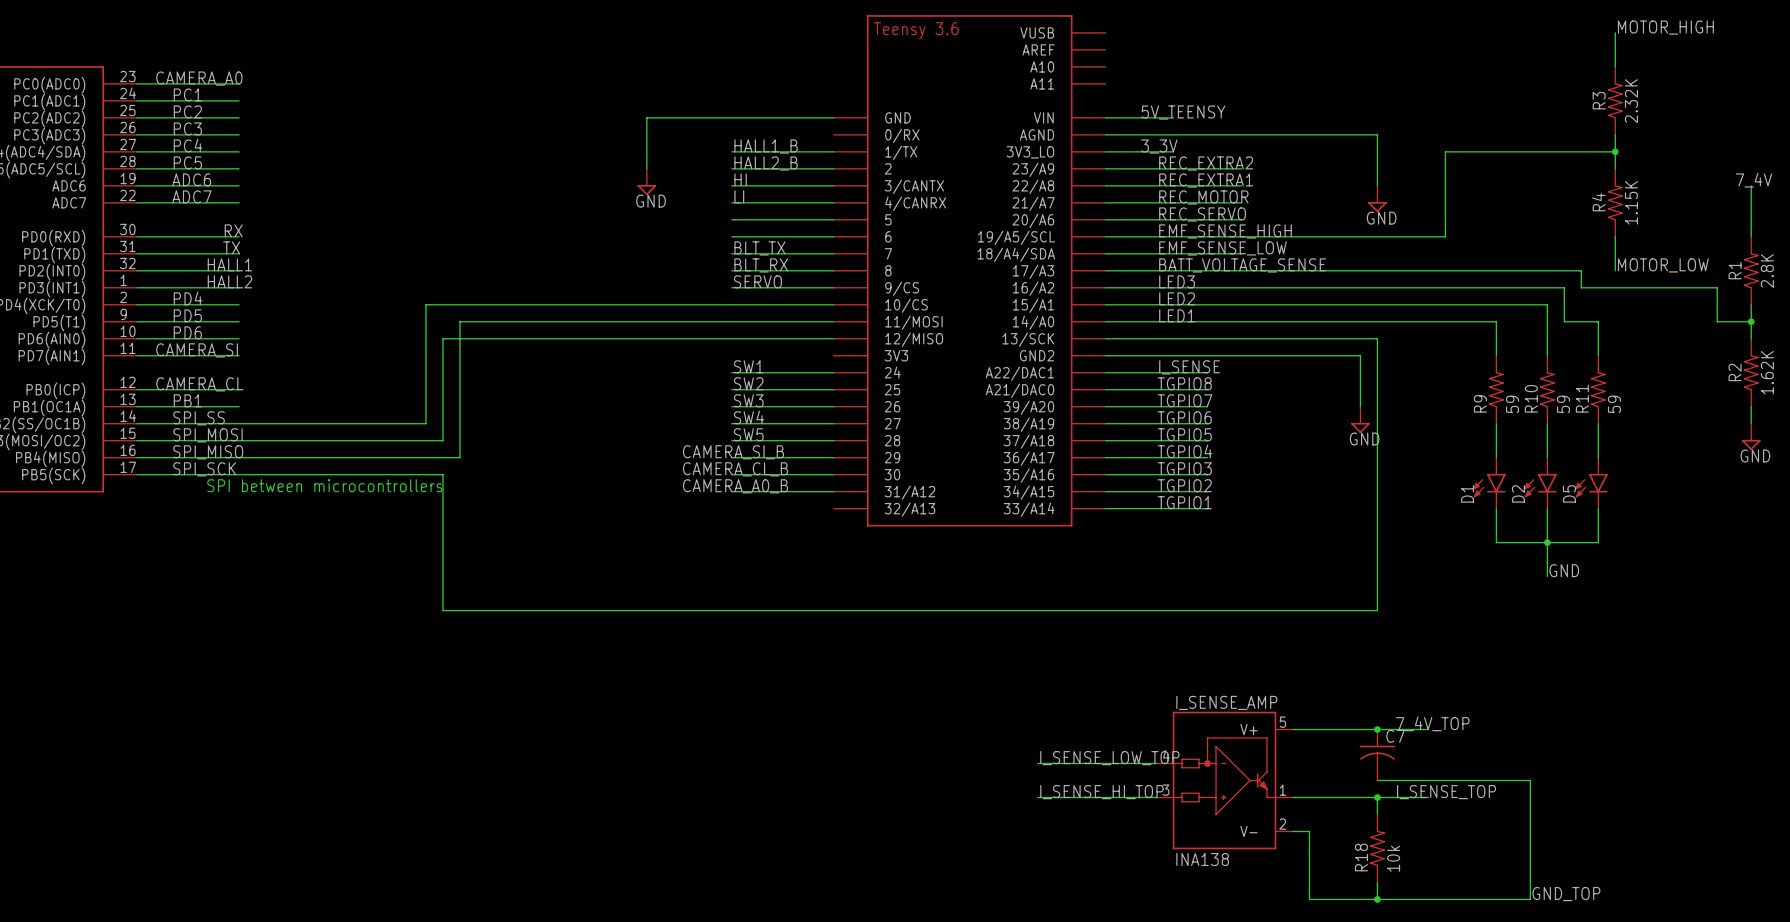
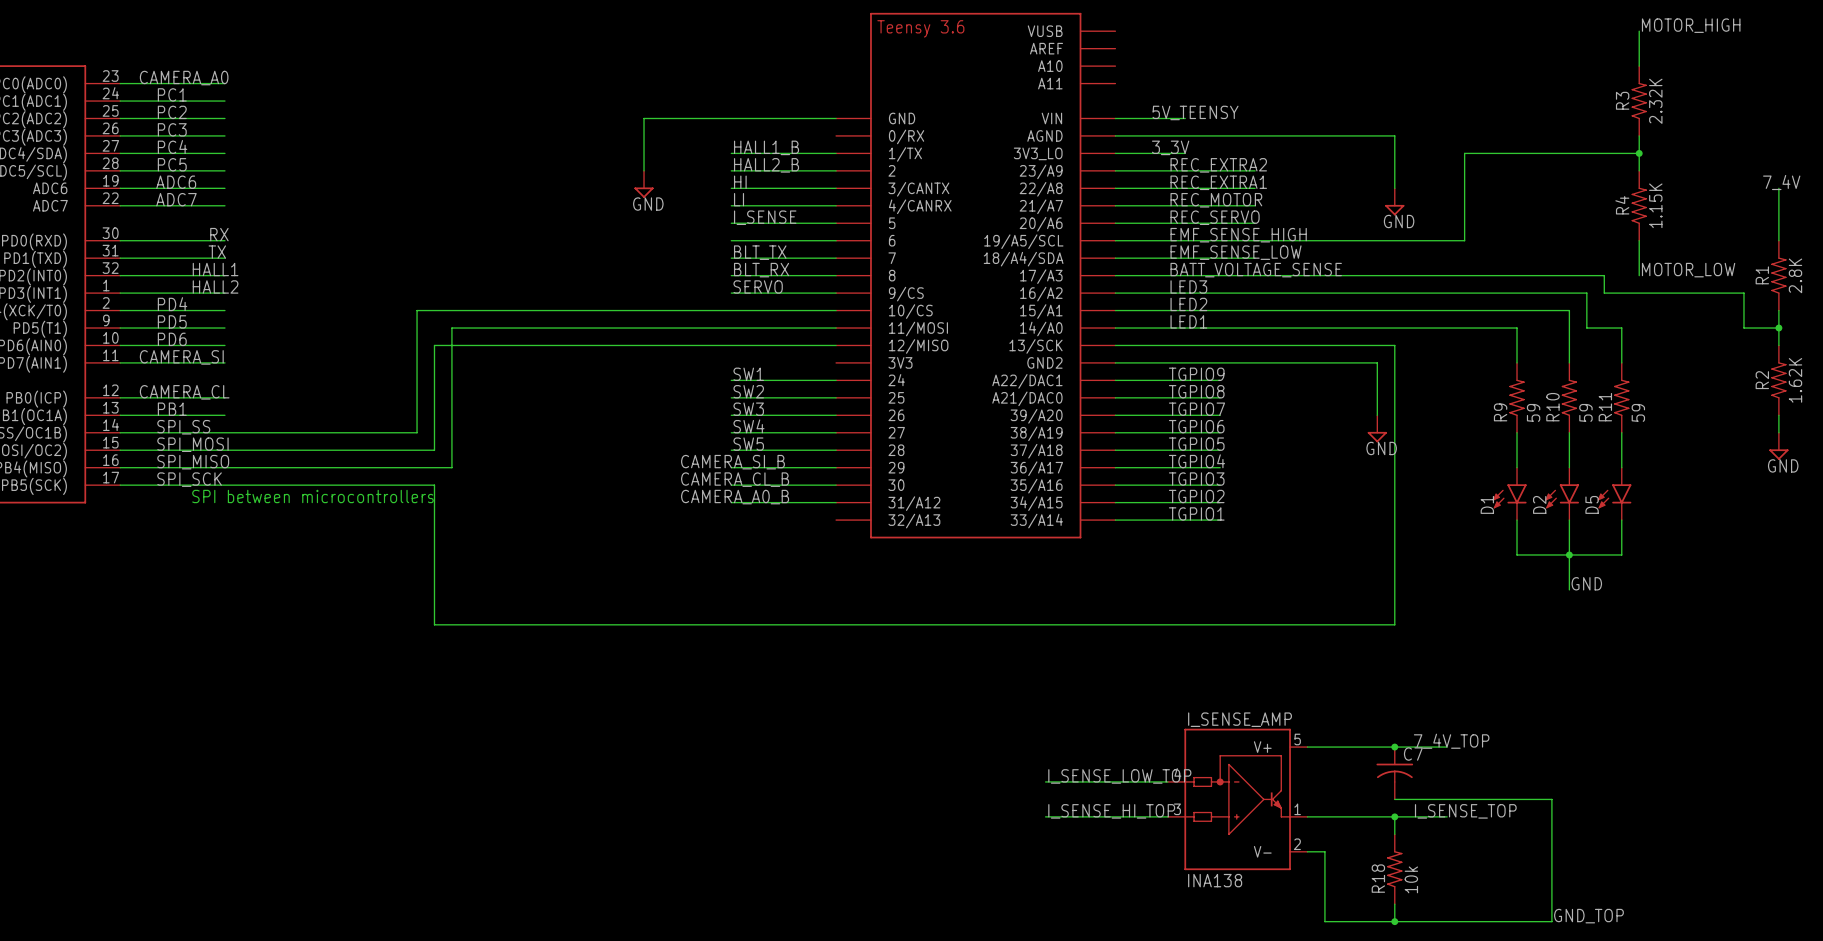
label: none -> I_SENSE (765, 217)
label: I_SENSE (1189, 367) -> TGPIO9 (1196, 374)

